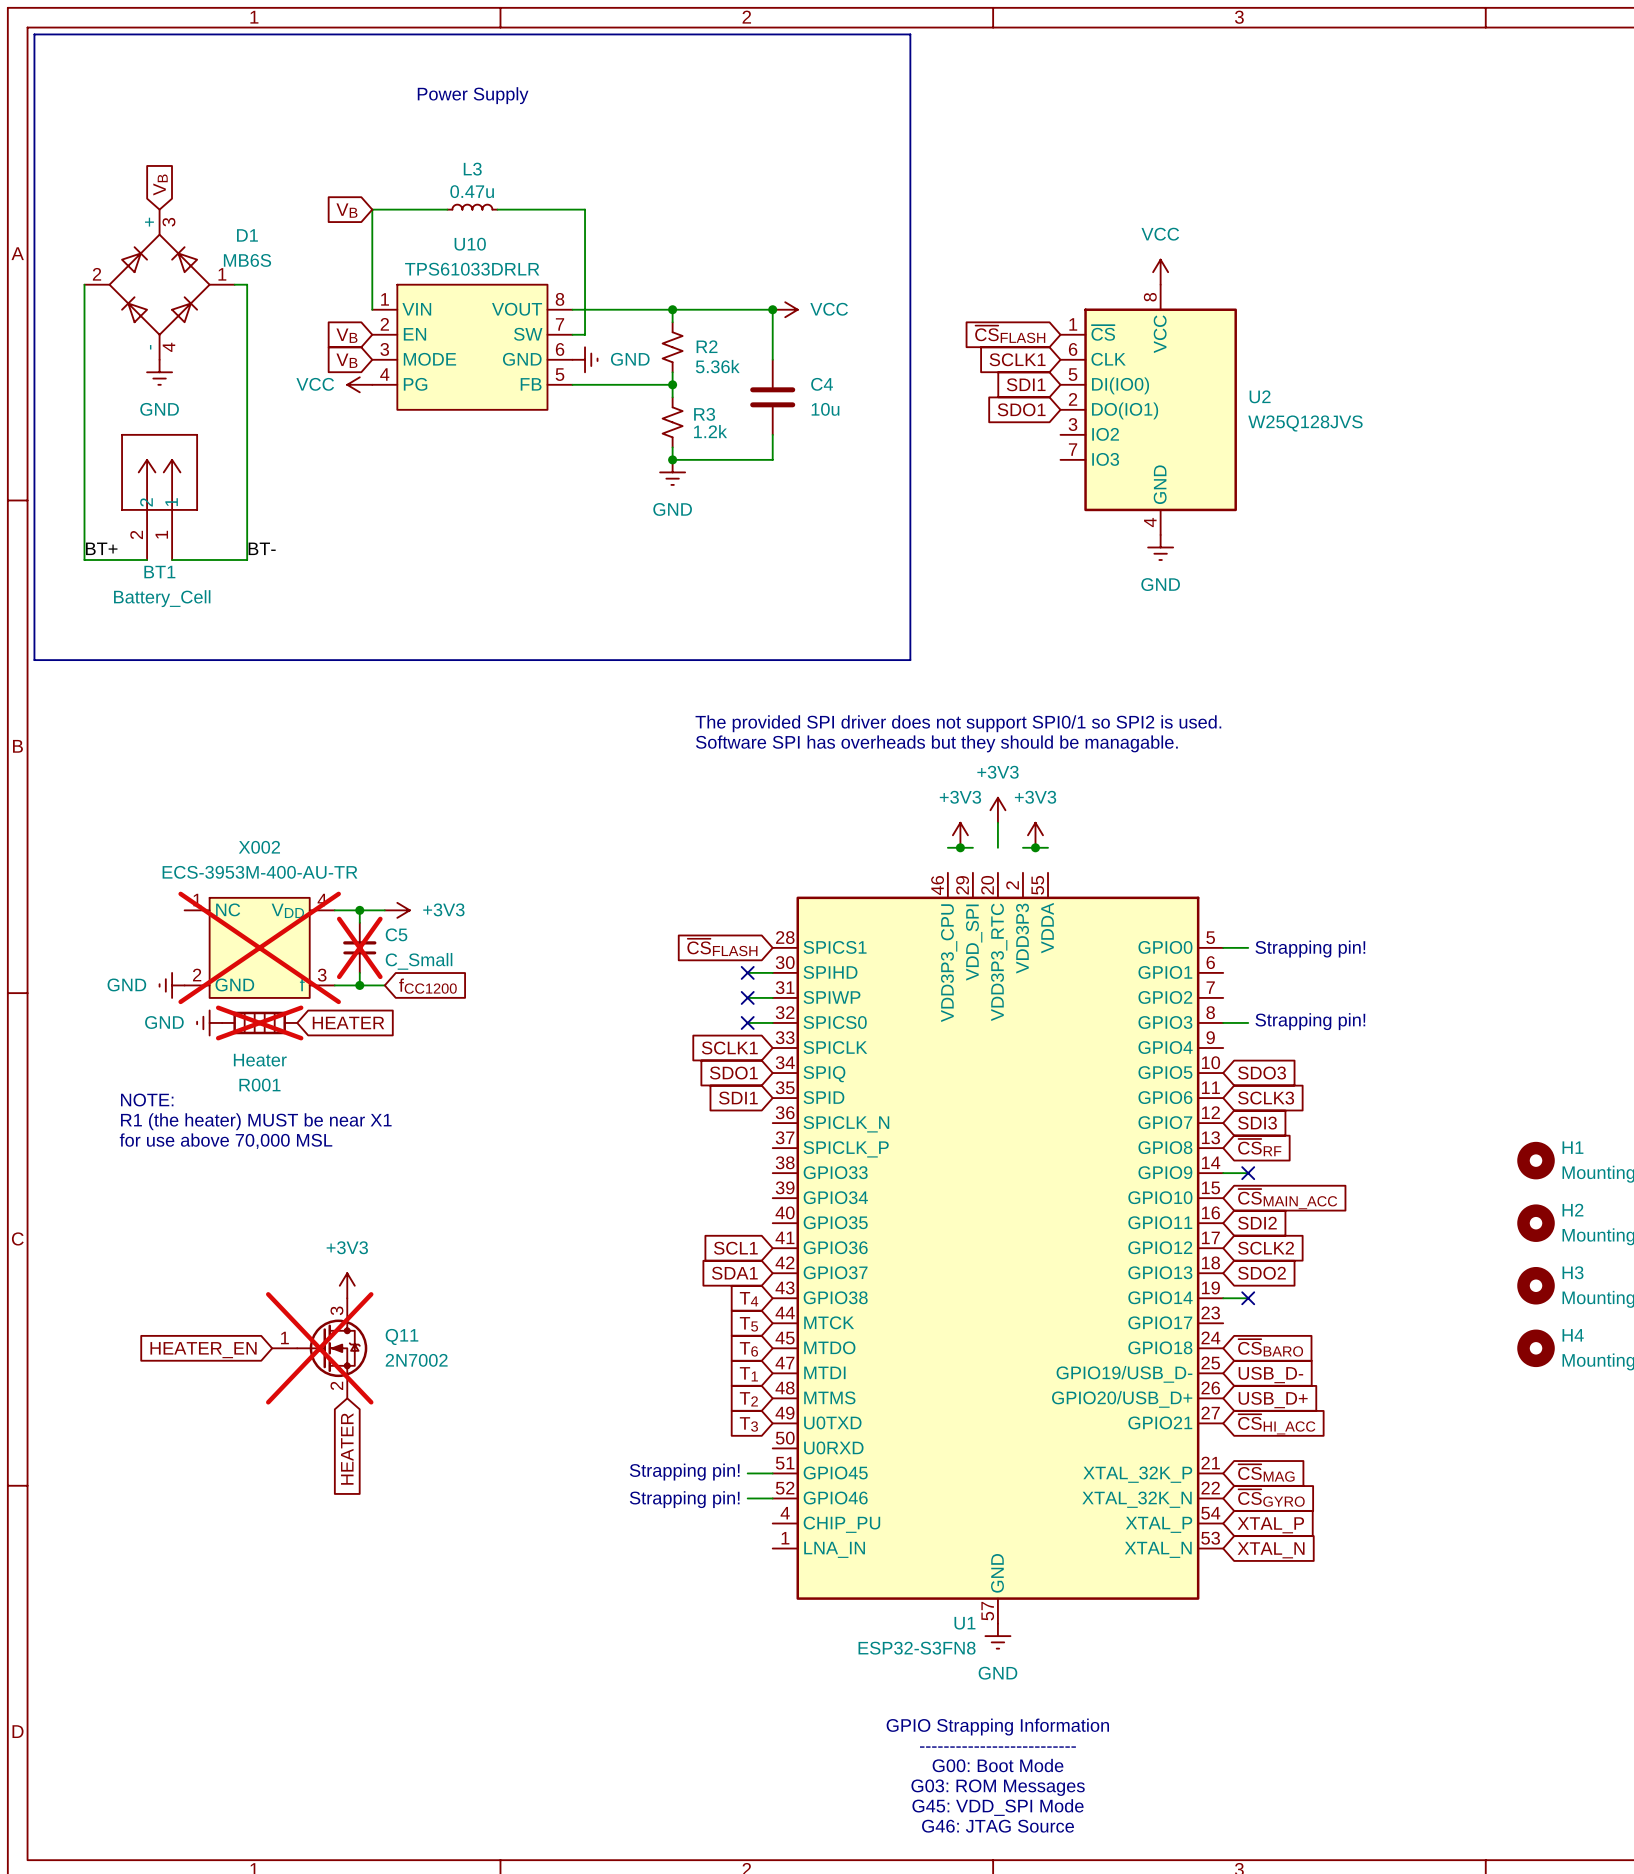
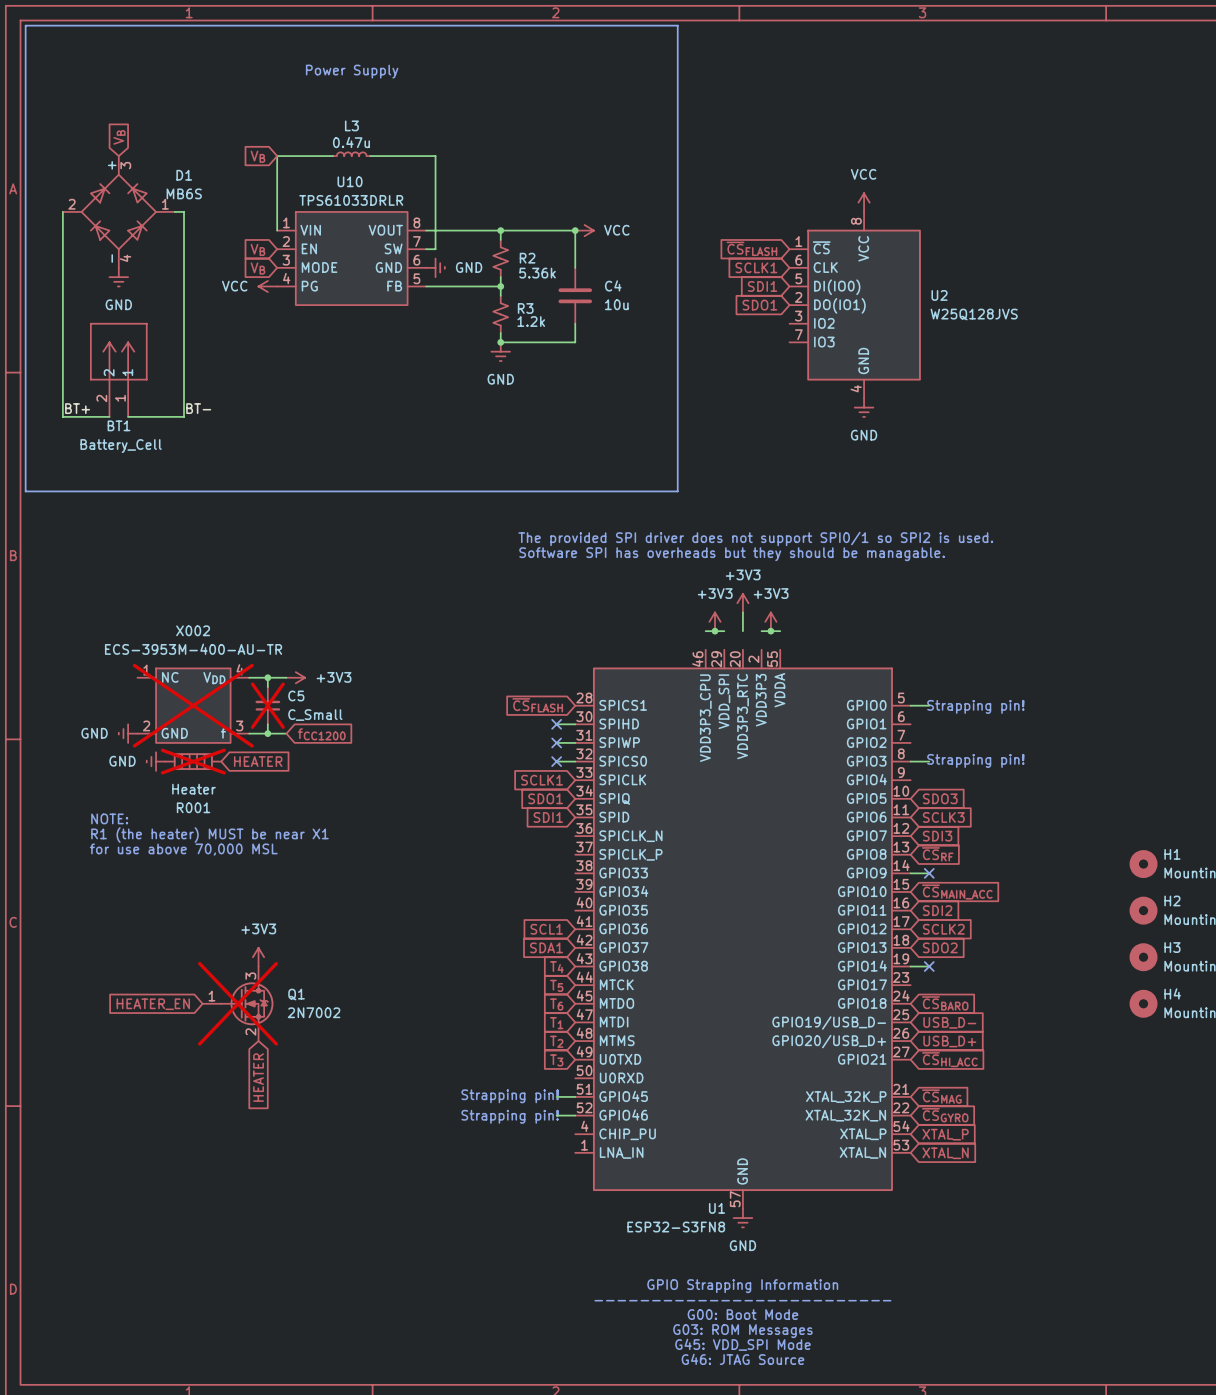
Q11 name: Q11 (401, 1336) -> Q1 (296, 994)

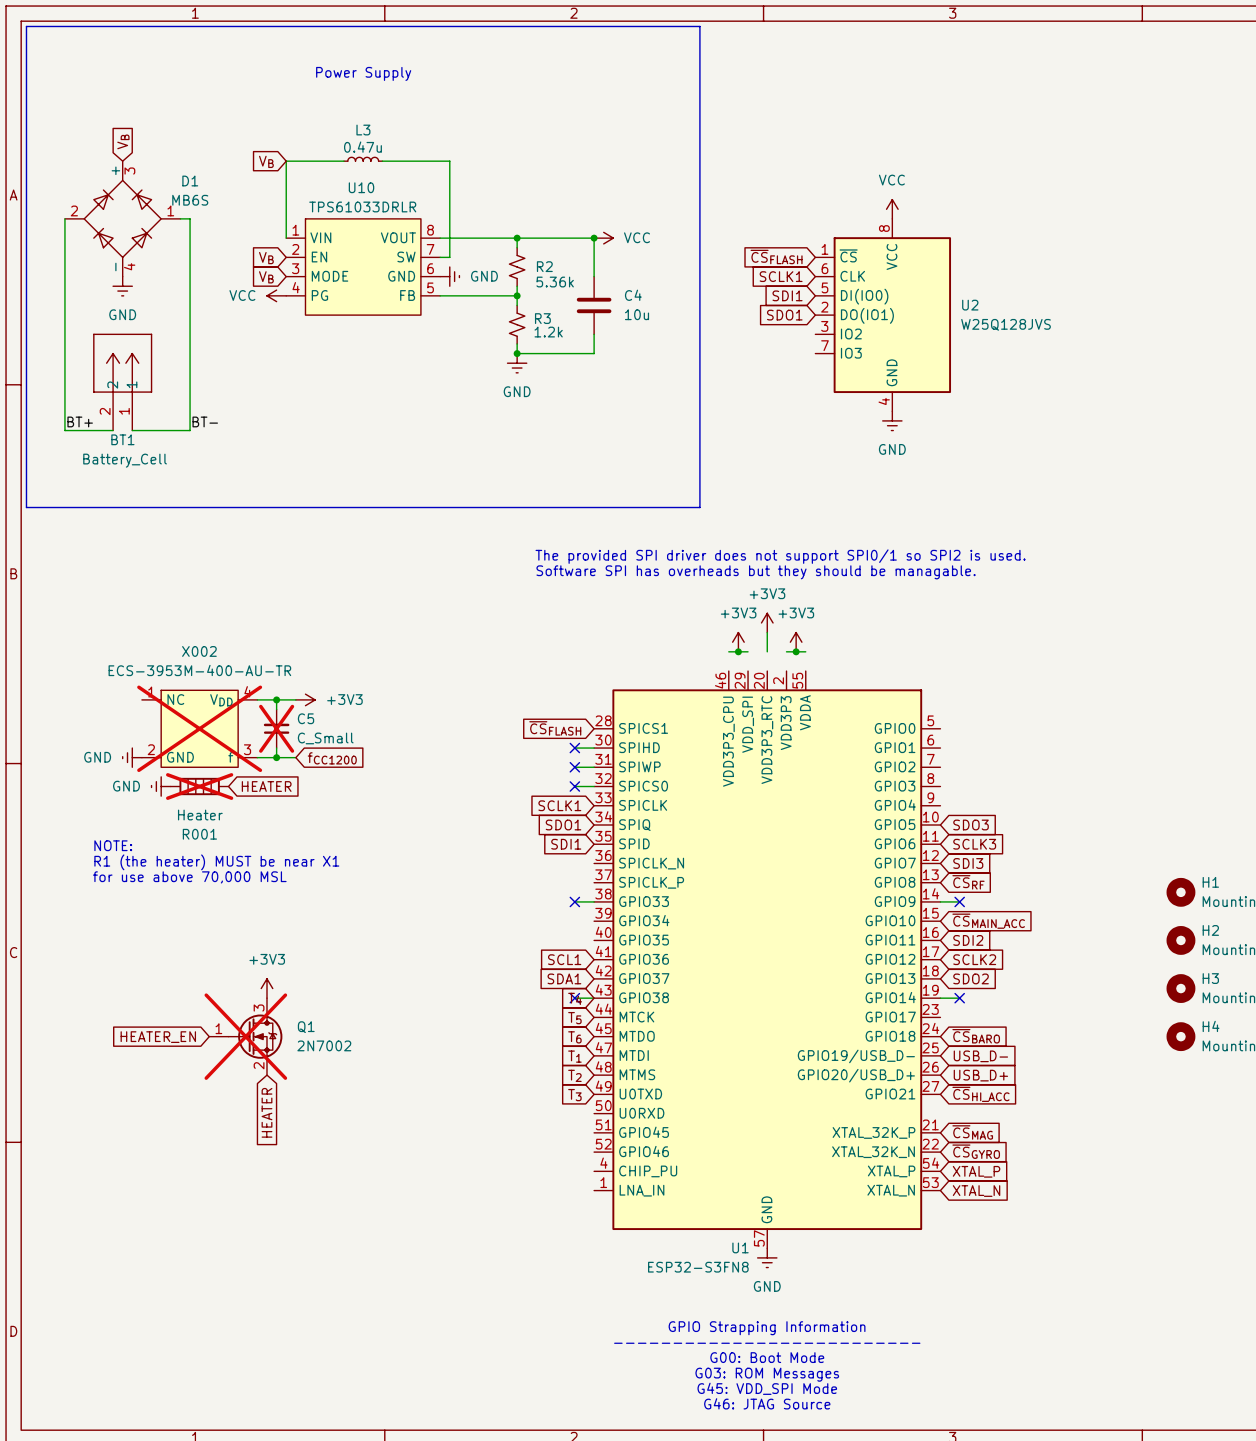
wire: (910, 705) (929, 705) -> none
text: Strapping pin! (975, 706) -> none
text: Strapping pin! (975, 760) -> none
wire: (910, 761) (929, 761) -> none
wire: none -> (574, 901) (594, 901)
no-connect mark: none -> (574, 901)
no-connect mark: none -> (574, 998)
text: Strapping pin! (510, 1096) -> none
wire: (556, 1096) (575, 1096) -> (574, 998) (594, 998)
wire: (556, 1115) (575, 1115) -> none
text: Strapping pin! (510, 1116) -> none

